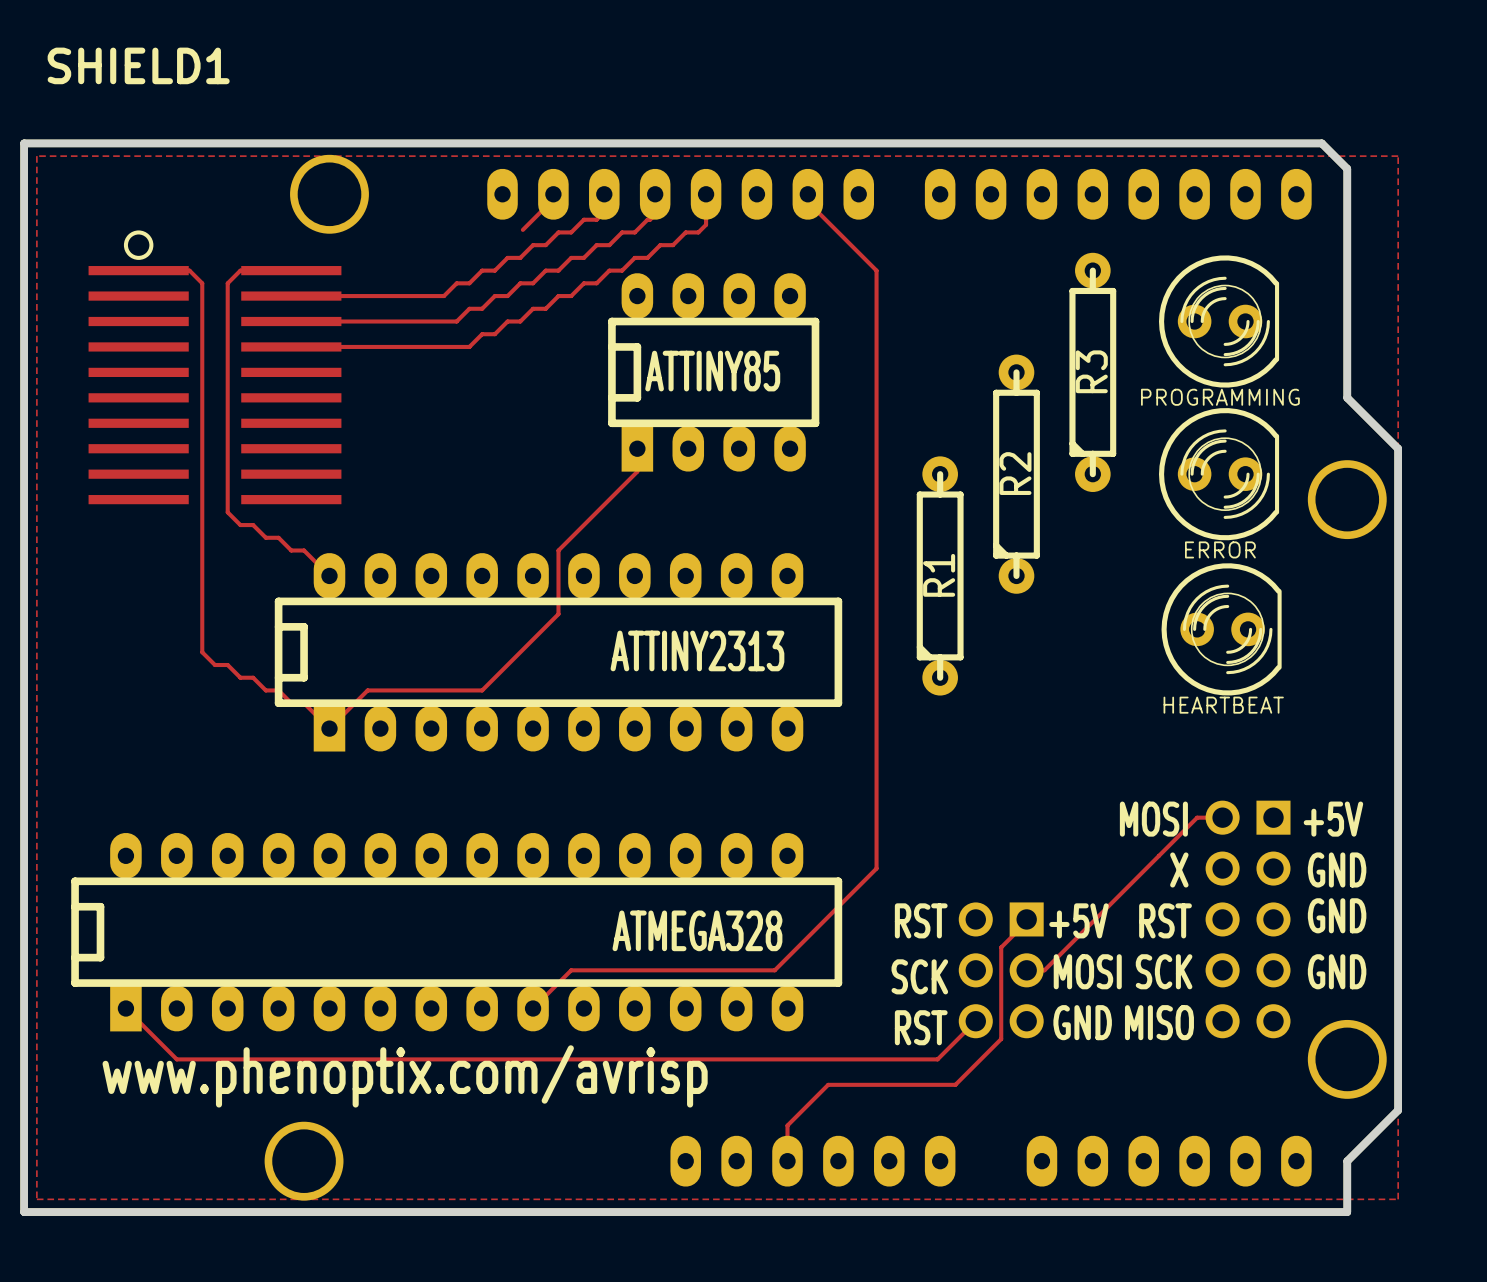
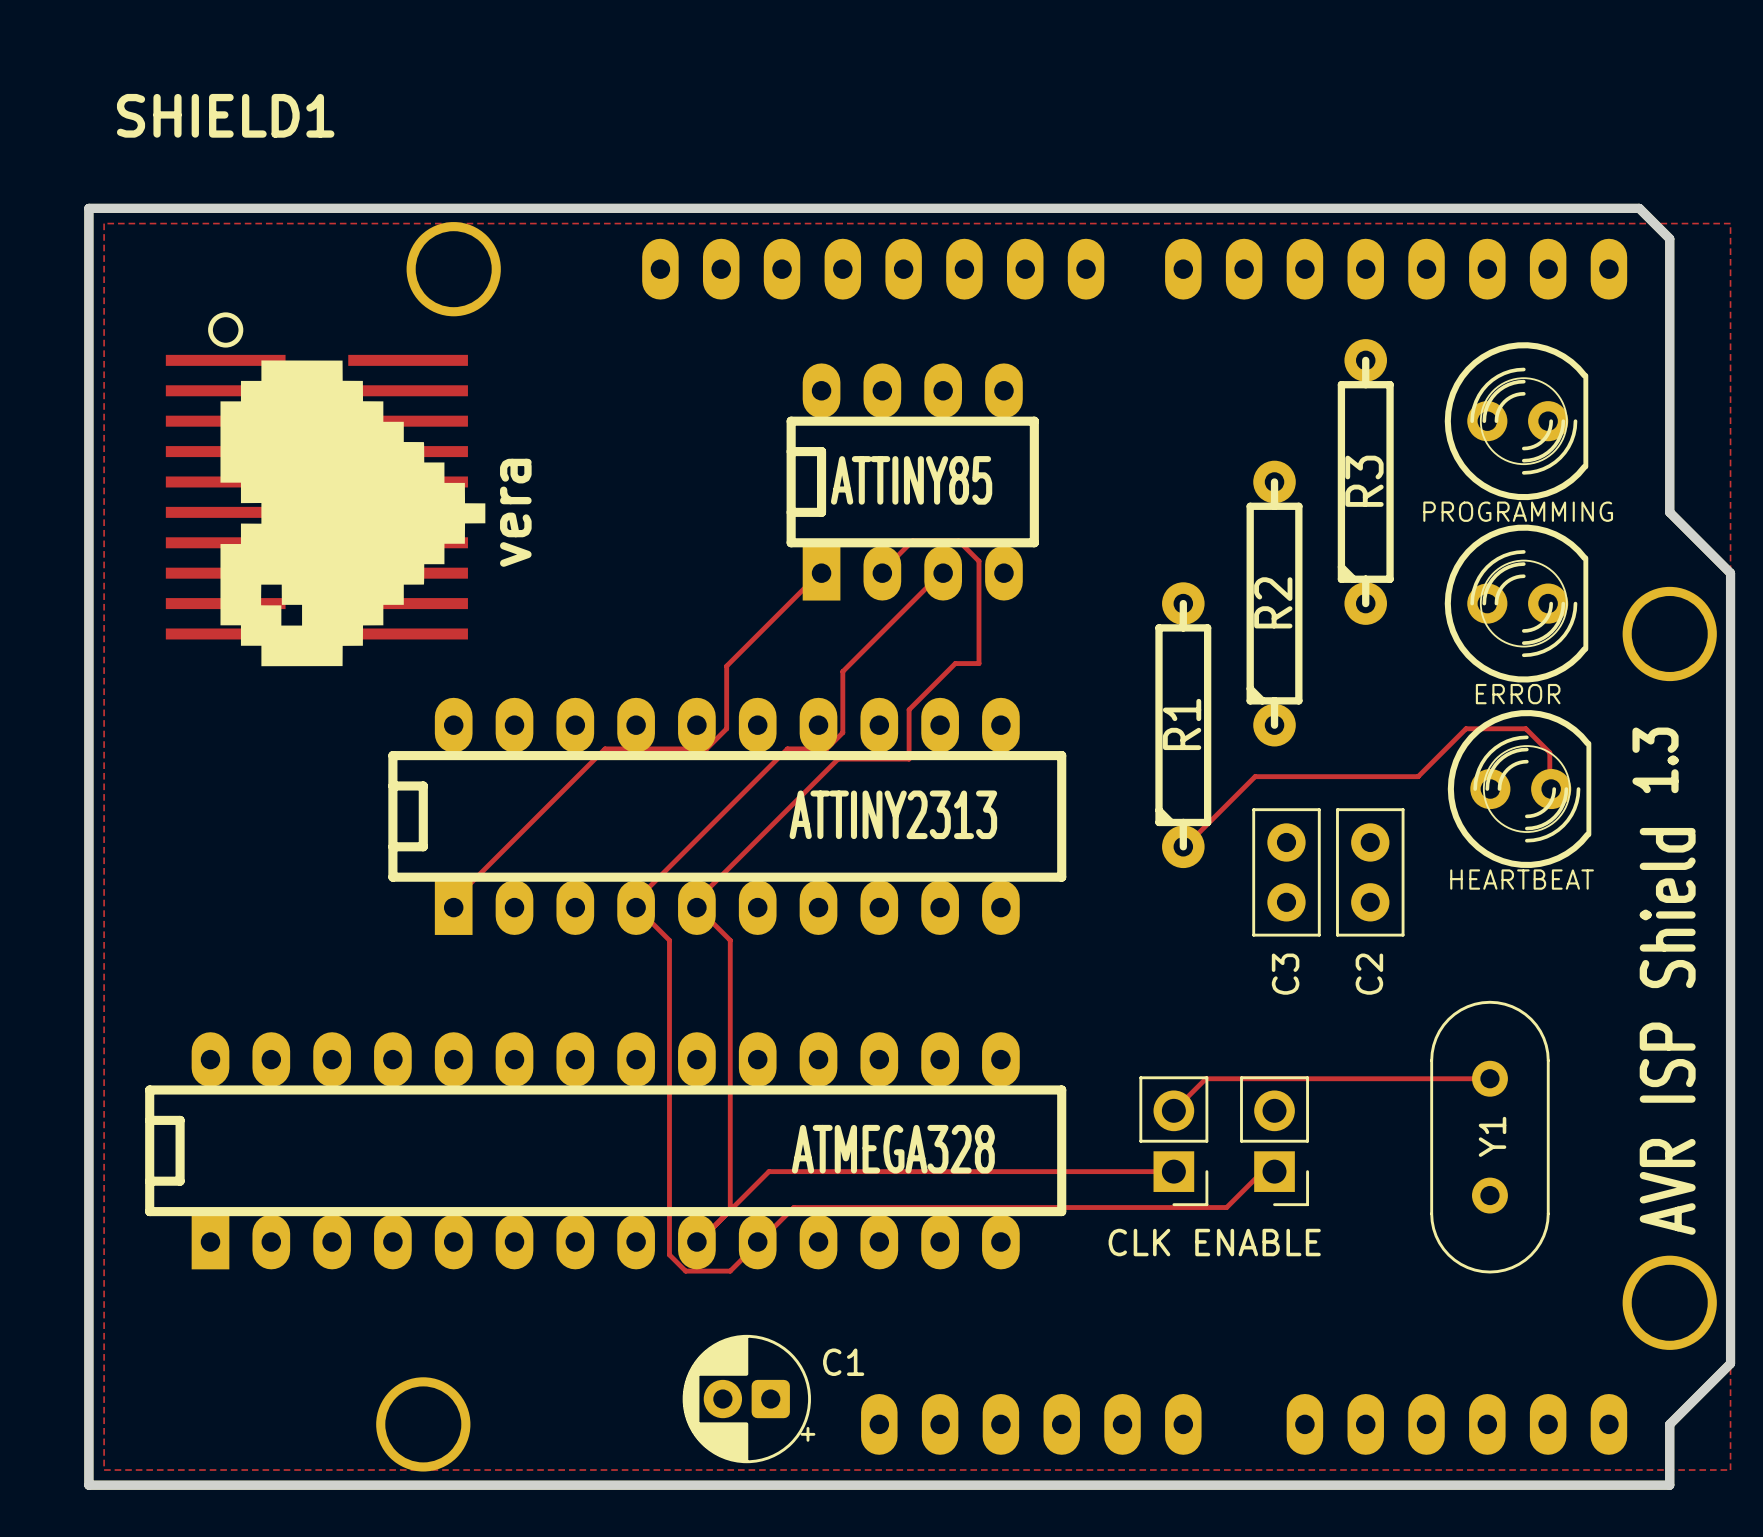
track: (553, 194) (553, 199) (522, 229) -> none
track: (604, 194) (604, 212) (596, 219) (583, 219) (571, 232) (558, 232) (545, 245) (533, 245) (520, 257) (507, 257) (494, 270) (482, 270) (469, 283) (456, 283) (443, 296) (291, 296) -> none
track: (655, 194) (655, 214) (634, 232) (622, 232) (609, 245) (596, 245) (583, 257) (571, 257) (558, 270) (545, 270) (533, 283) (520, 283) (507, 296) (494, 296) (482, 308) (469, 308) (456, 321) (291, 321) -> none
track: (706, 194) (706, 224) (698, 232) (685, 232) (672, 245) (660, 245) (647, 257) (634, 257) (622, 270) (609, 270) (596, 283) (583, 283) (571, 296) (558, 296) (545, 308) (533, 308) (520, 321) (507, 321) (494, 334) (482, 334) (469, 346) (291, 346) -> none
track: (807, 194) (807, 201) (876, 270) (876, 868) (774, 970) (571, 970) (533, 1008) -> none
drawing: none -> [220, 360, 486, 667]
track: (138, 270) (189, 270) (202, 283) (202, 652) (214, 665) (227, 665) (240, 677) (253, 677) (265, 690) (278, 690) (291, 703) (304, 703) (329, 728) (367, 690) (482, 690) (558, 614) (558, 550) (637, 471) (637, 448) -> none
track: (291, 270) (240, 270) (227, 283) (227, 512) (240, 525) (253, 525) (265, 537) (278, 537) (291, 550) (304, 550) (329, 575) -> none
text: none -> vera (515, 512)
track: none -> (824, 568) (726, 666) (726, 728) (706, 748) (605, 748) (450, 903)
track: none -> (885, 568) (912, 540) (958, 540) (979, 561) (979, 663) (955, 663) (909, 709) (909, 759) (838, 759) (693, 903) (730, 940) (730, 1210)
track: none -> (945, 568) (842, 671) (842, 732) (826, 748) (787, 748) (632, 903) (669, 940) (669, 1254) (685, 1271) (730, 1271) (793, 1207) (1226, 1207) (1262, 1171)
track: none -> (1549, 789) (1549, 752) (1525, 728) (1466, 728) (1418, 776) (1255, 776) (1183, 848)
C3: none -> (1286, 872)
C2: none -> (1370, 872)
text: none -> AVR ISP Shield 1.3 (1664, 981)
track: (1222, 817) (1197, 817) (1044, 970) (1026, 970) -> none
text: MOSI (1153, 819) -> none
text: +5V (1333, 819) -> none
text: X (1179, 869) -> none
text: GND (1337, 869) -> none
track: none -> (1489, 1078) (1205, 1078) (1173, 1110)
text: GND (1337, 915) -> none
track: (1026, 919) (1026, 922) (1001, 947) (1001, 1039) (955, 1084) (828, 1084) (787, 1125) (787, 1161) -> none
part: (1248, 919) -> none
text: RST (921, 920) -> none
text: +5V (1078, 920) -> none
text: RST (1165, 920) -> none
Y1: none -> (1489, 1137)
CLK ENABLE: none -> (1173, 1141)
part: none -> (1274, 1141)
track: none -> (1173, 1171) (768, 1171) (697, 1243)
part: (1001, 970) -> none
text: MOSI (1087, 971) -> none
text: SCK (1164, 971) -> none
text: GND (1337, 971) -> none
text: SCK (919, 976) -> none
track: (125, 1008) (176, 1059) (937, 1059) (975, 1021) -> none
text: GND (1082, 1022) -> none
text: MISO (1159, 1022) -> none
text: RST (921, 1027) -> none
text: www.phenoptix.com/avrisp (405, 1076) -> none
C1: none -> (749, 1399)

